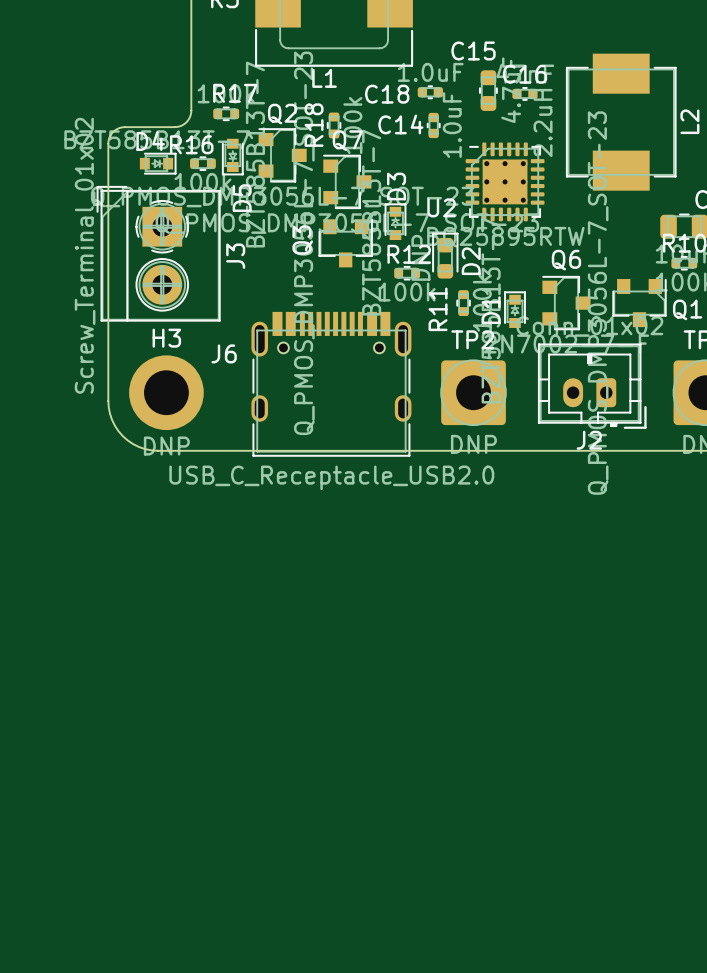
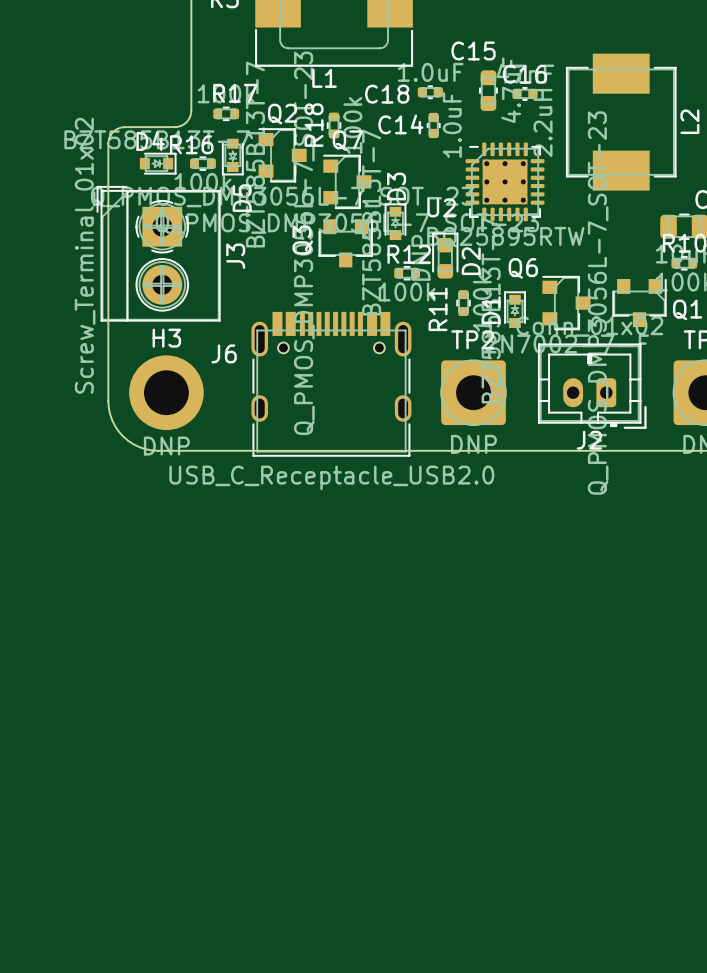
Q6 name position: Q6 (566, 260) -> Q6 (523, 268)

